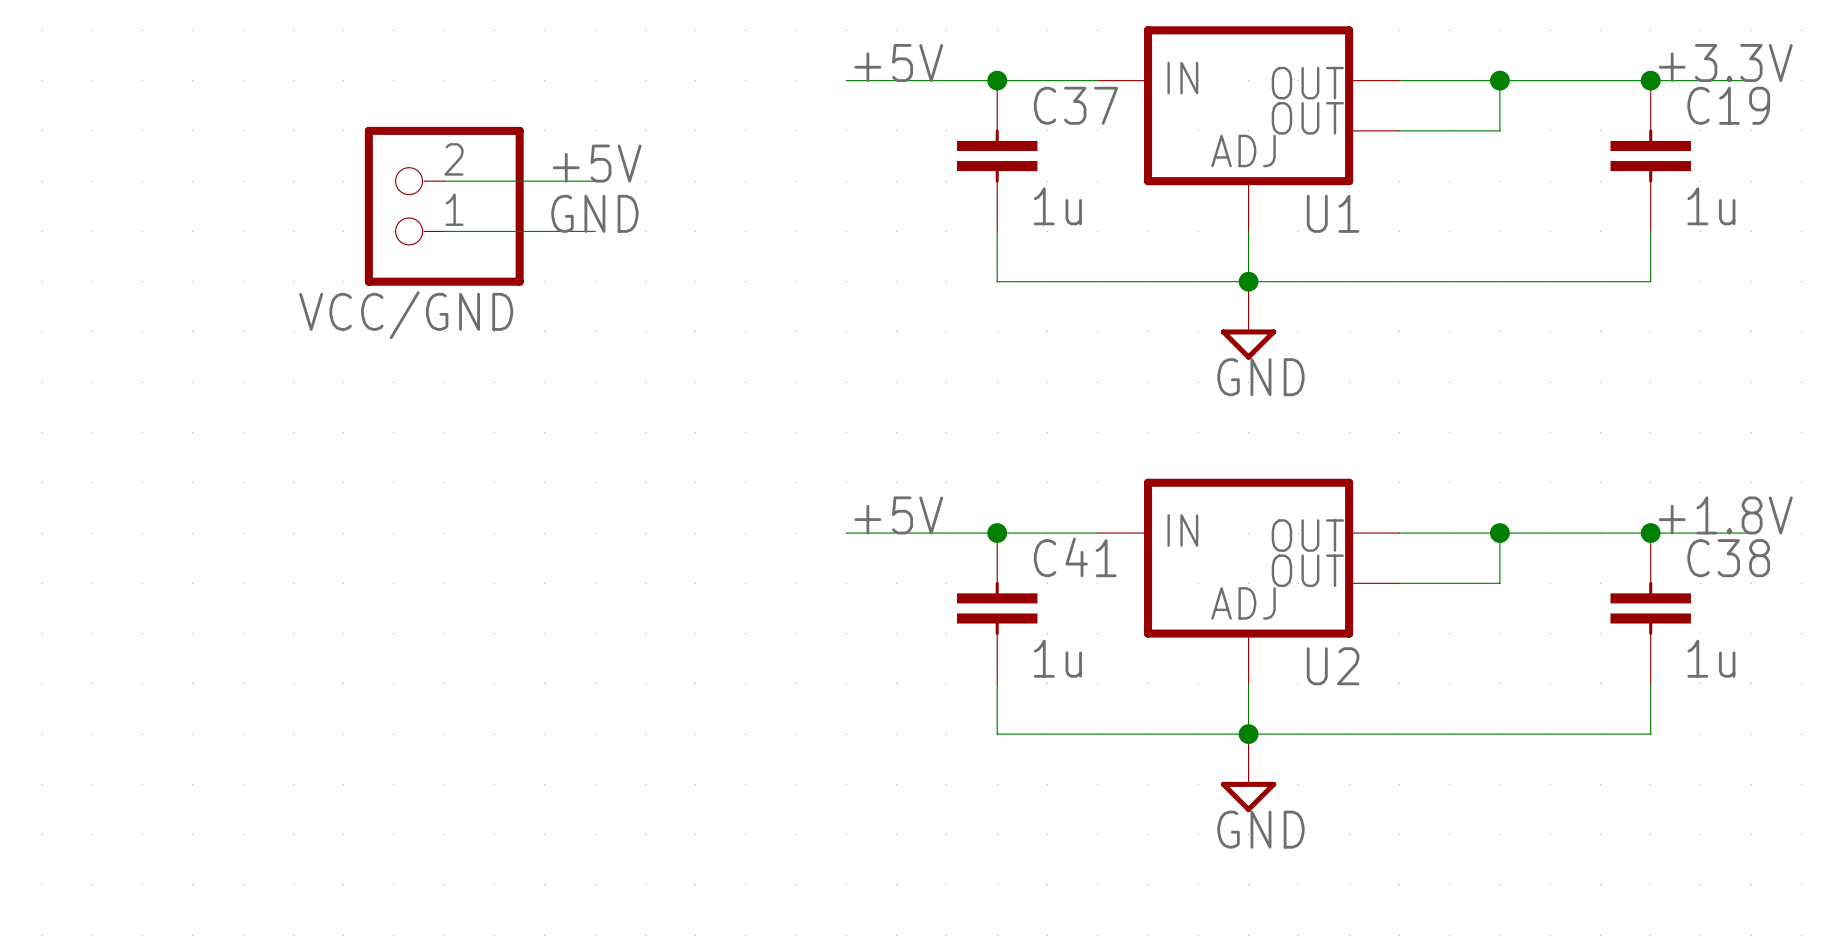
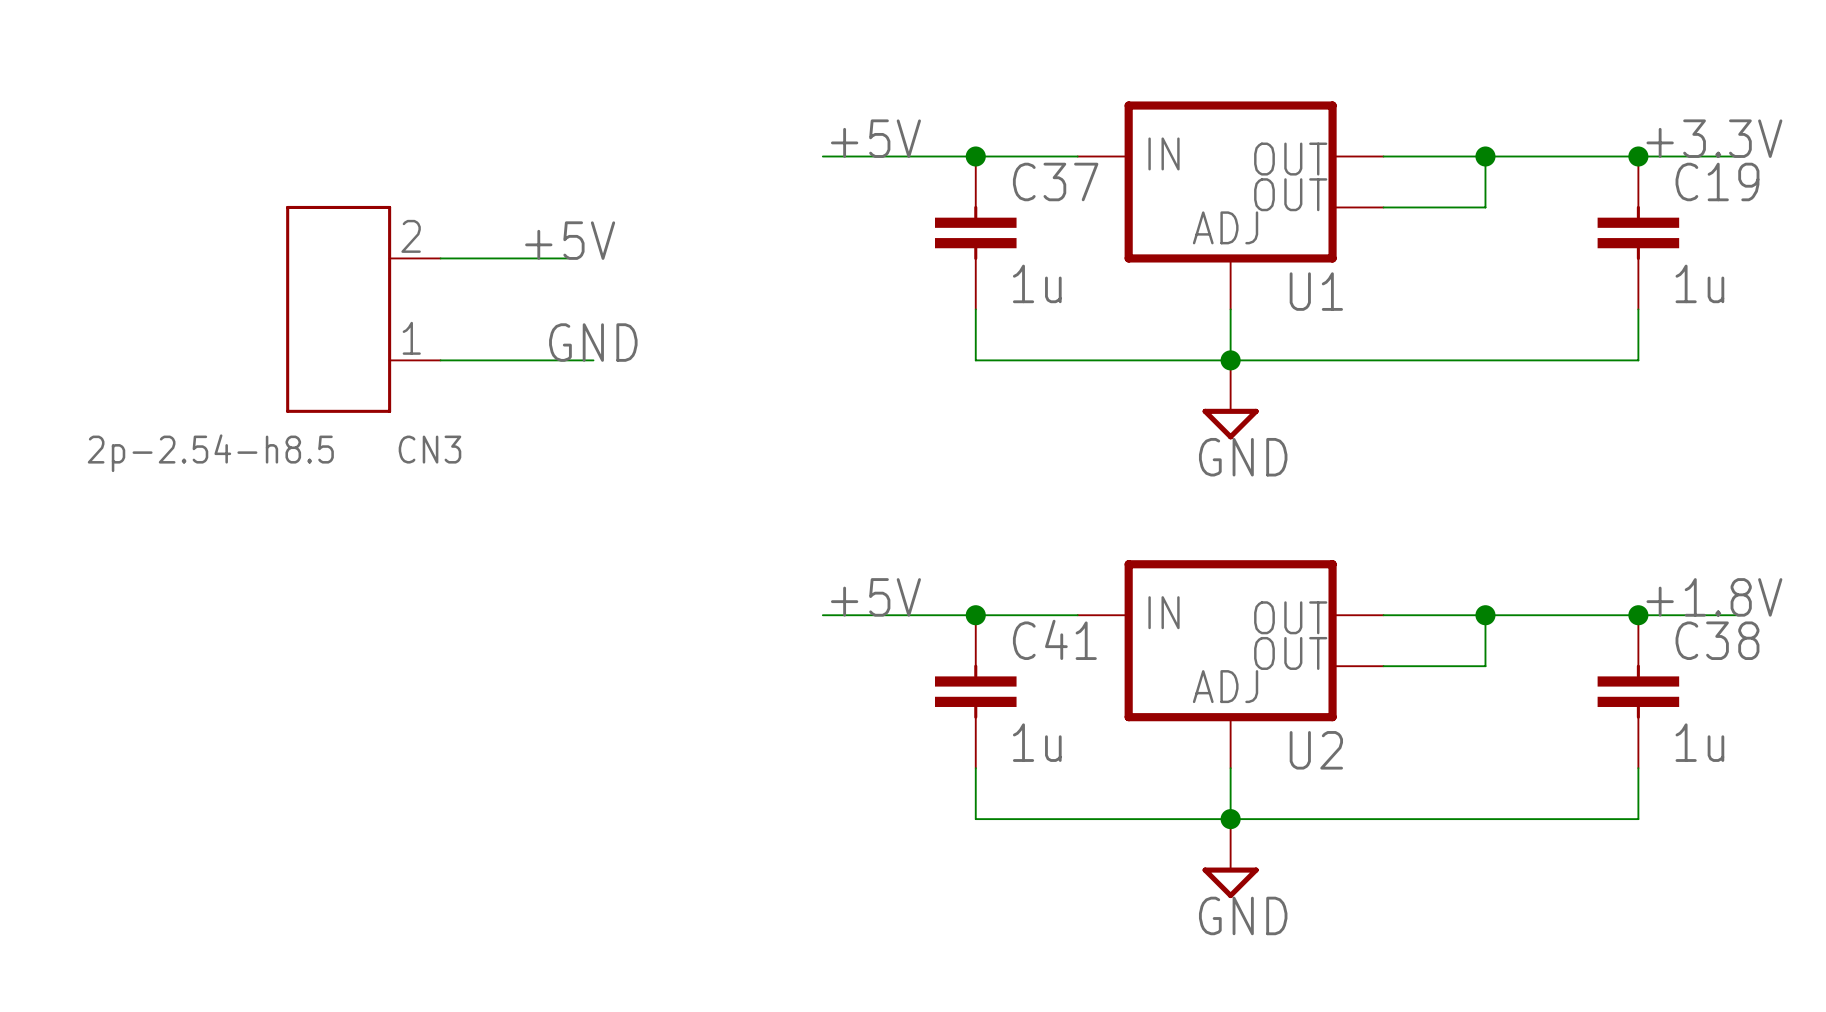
VCC/GND: (444, 206) -> none
label position: GND (594, 213) -> GND (593, 342)
CN3: none -> 2p-2.54-h8.5 (363, 309)
wire: (444, 231) (595, 231) -> (440, 360) (593, 360)

